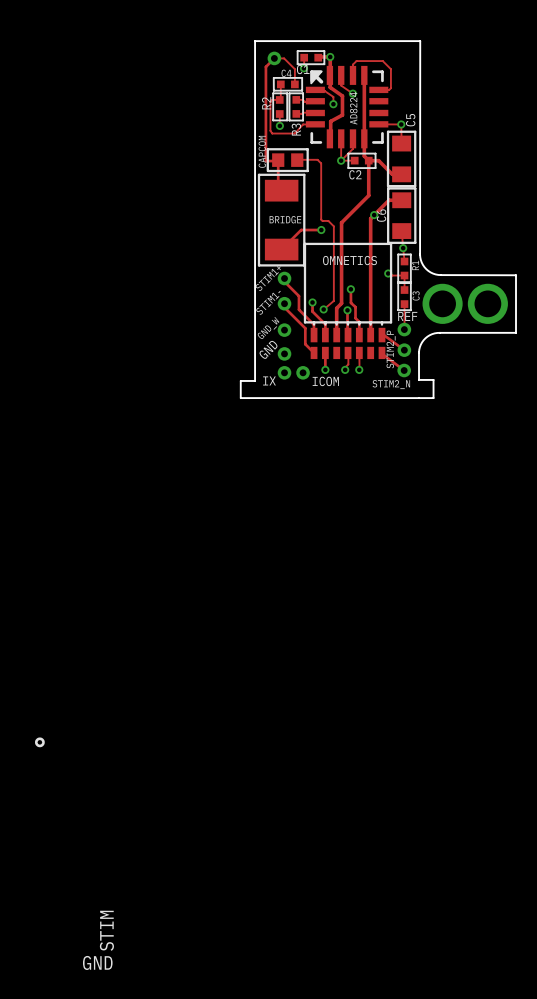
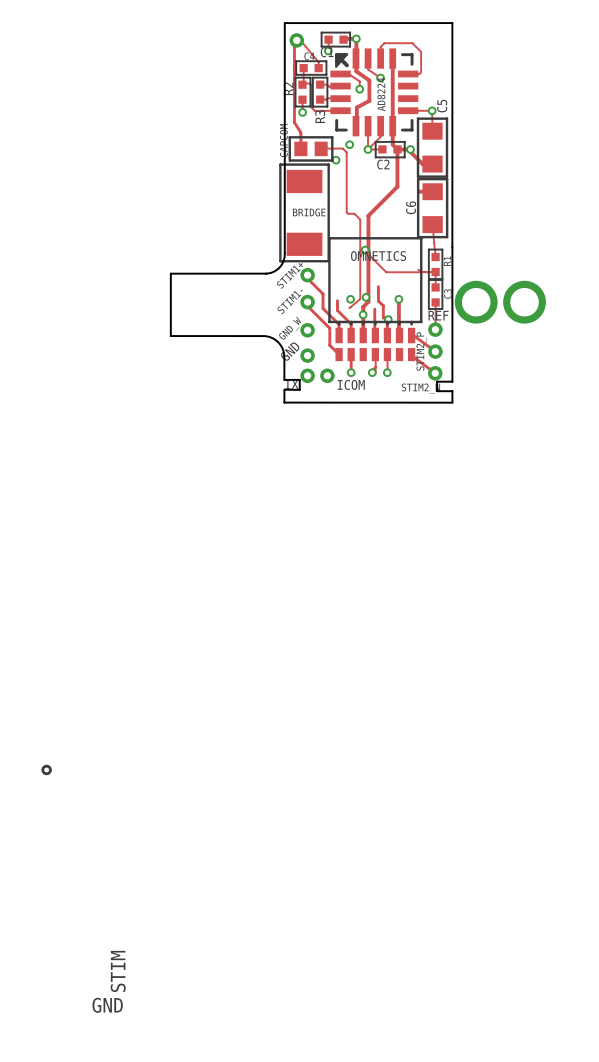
track: (294, 78) (294, 69) (284, 58) (274, 58) (265, 66) (265, 161) (278, 161) (278, 190) (281, 190) -> (318, 62) (300, 40) (294, 46) (294, 122) (300, 132) (300, 148)
track: (279, 99) (270, 101) (270, 130) (272, 133) (294, 133) (303, 124) -> (303, 83) (309, 83) (311, 85) (311, 107) (314, 110) (327, 110)
via: none -> (349, 144)
via: none -> (410, 149)
via: none -> (336, 160)
track: (389, 200) (370, 218) (370, 335) -> (398, 299) (399, 335)
via: (374, 215) -> none
track: (321, 230) (301, 230) (281, 249) -> none
via: (321, 230) -> none
via: (403, 248) -> none
board edge: none -> (452, 247) (452, 381) (437, 381) (437, 391) (452, 391) (452, 402) (284, 402) (284, 389)
board edge: none -> (452, 247) (452, 23) (284, 23) (284, 253)
track: none -> (365, 250) (386, 272) (435, 272)
via: none -> (365, 250)
board edge: none -> (284, 253) (281, 265) (268, 273) (170, 273) (170, 336) (261, 336)
via: (388, 273) -> none
via: (350, 289) -> none
via: none -> (366, 297)
via: none -> (350, 299)
via: none -> (398, 299)
via: (312, 302) -> none
via: (323, 309) -> none
via: (347, 310) -> none
via: none -> (363, 314)
via: none -> (388, 319)
board edge: (439, 332) (516, 332) (516, 275) (438, 274) (428, 270) (421, 262) (420, 254) (420, 41) (255, 41) (255, 380) (240, 380) (240, 398) (433, 398) (433, 379) (419, 379) (418, 352) -> none
board edge: (440, 332) (432, 334) (425, 338) (420, 344) (418, 352) -> none
board edge: none -> (261, 336) (272, 338) (282, 347) (284, 355) (284, 379)
board edge: none -> (284, 379) (299, 379) (299, 389) (284, 389)

